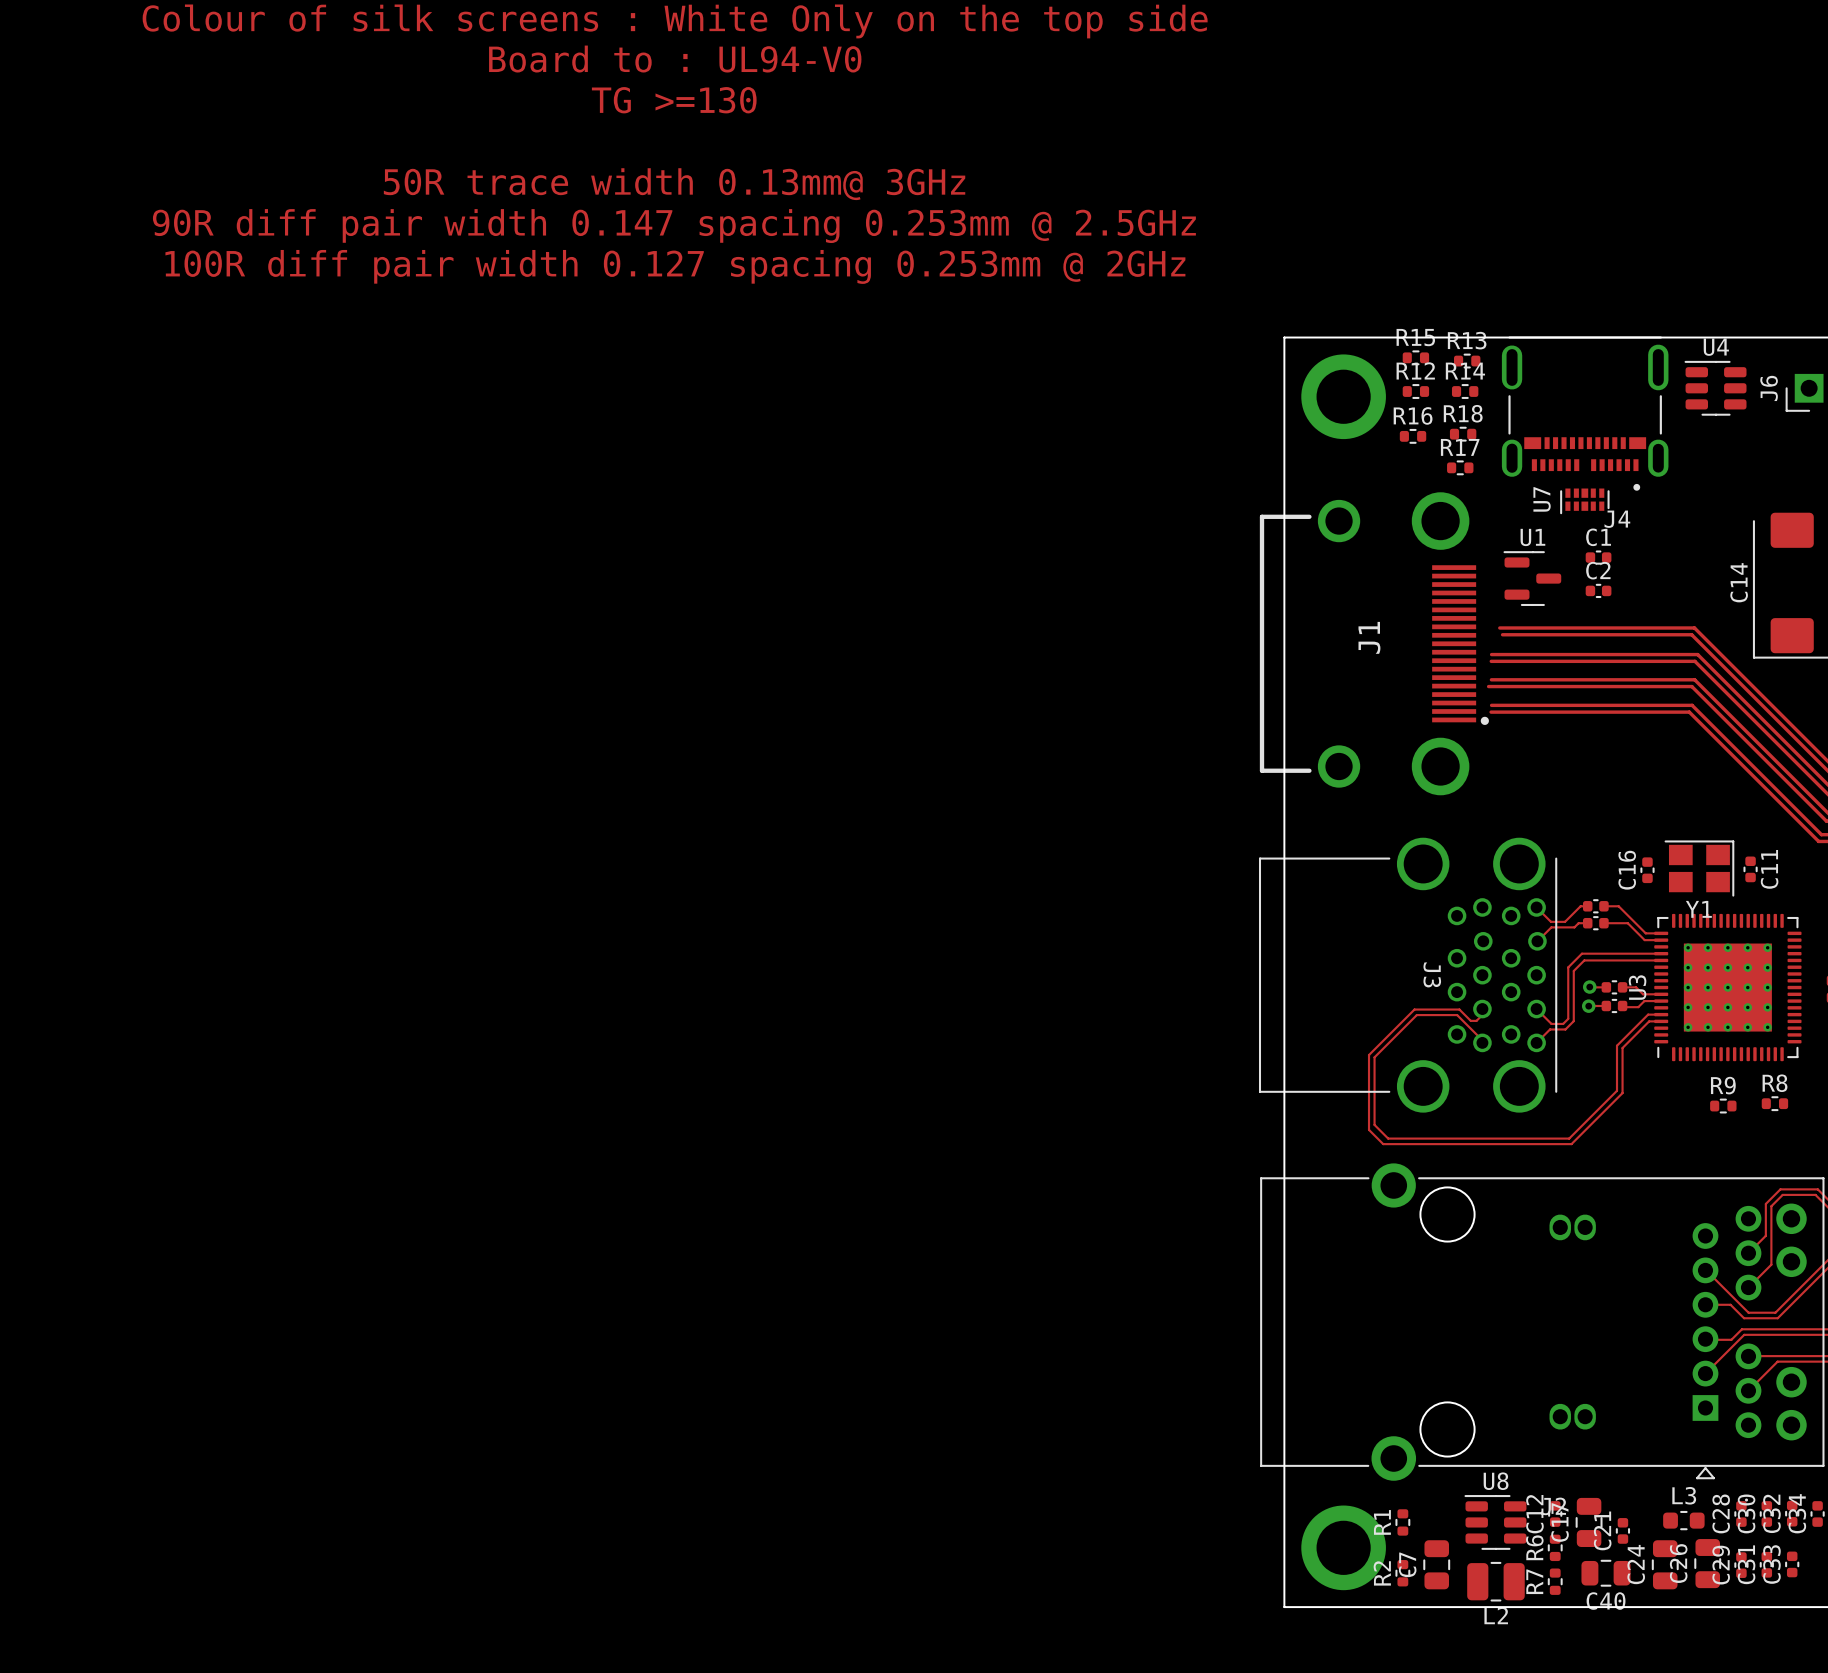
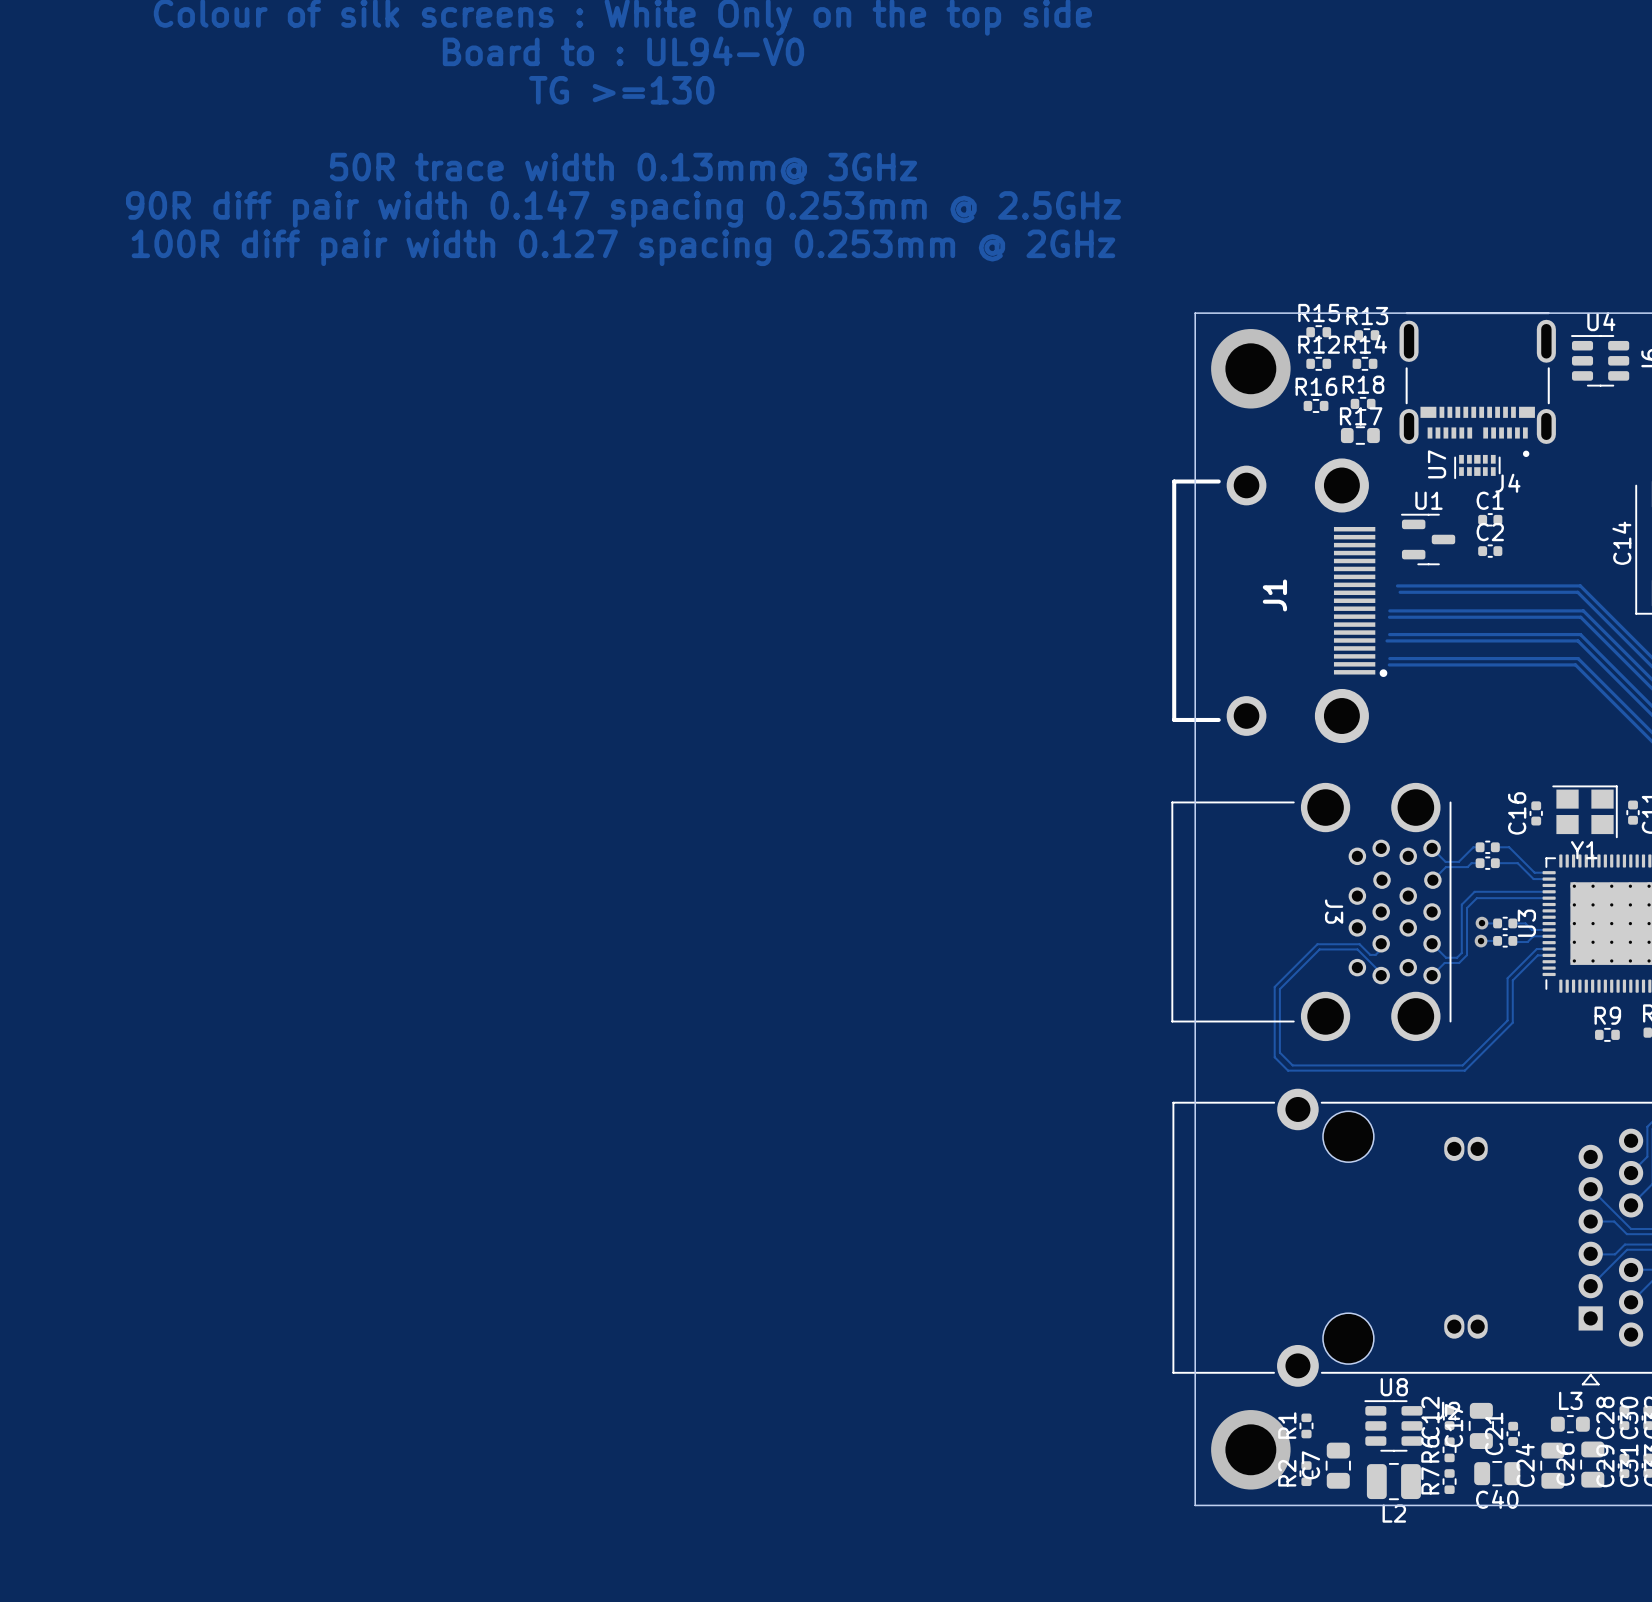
R17 footprint: [1447, 460, 1474, 476] -> [1340, 426, 1380, 445]

